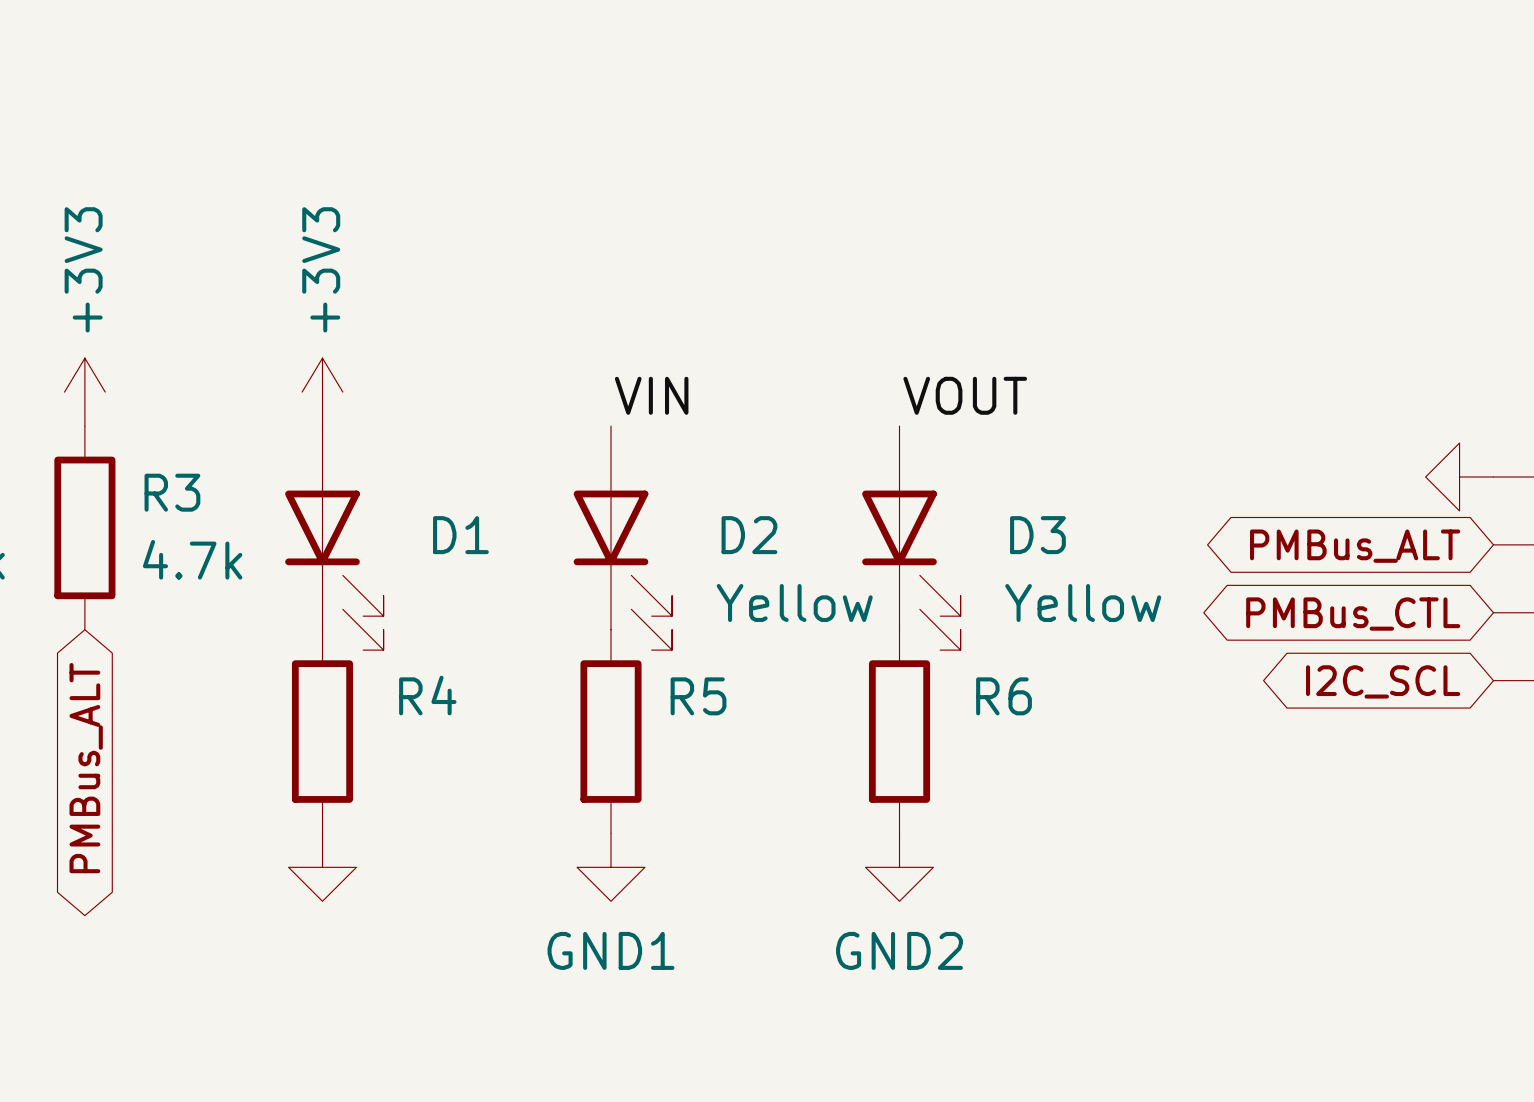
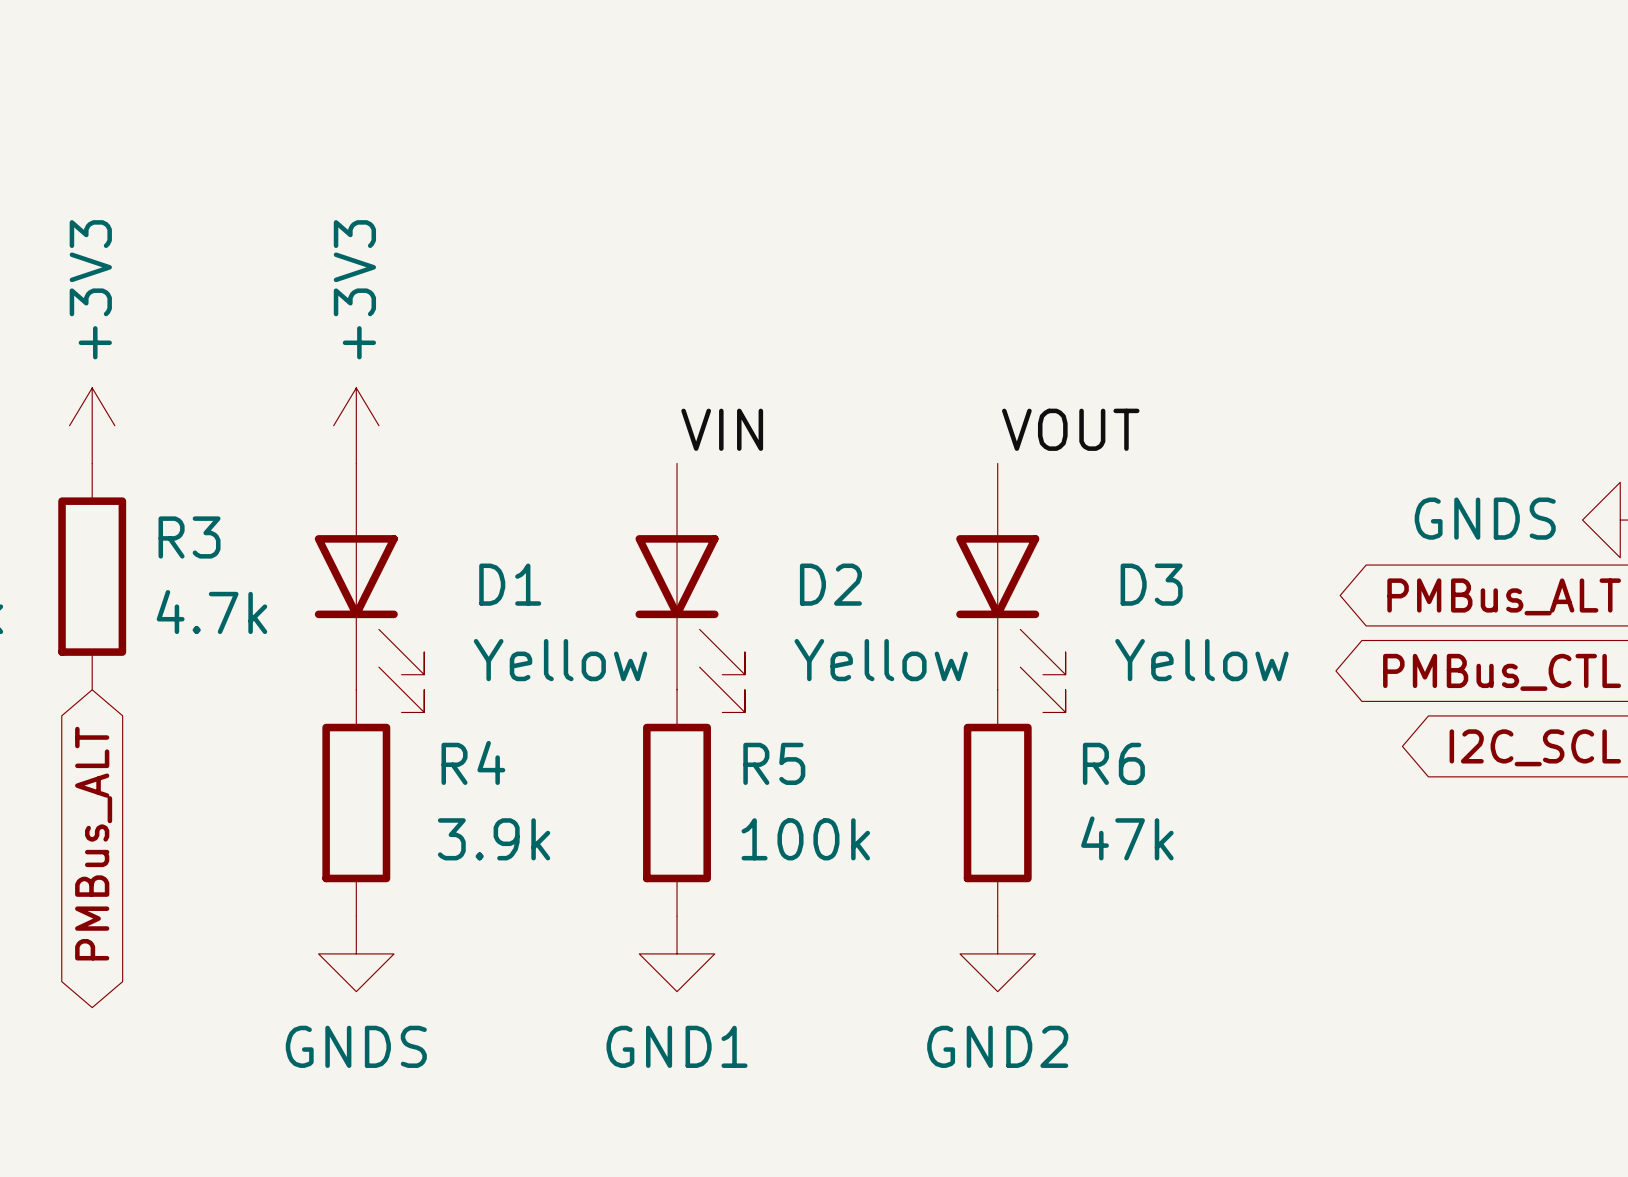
power symbol text: none -> GNDS (1485, 518)
D1 value: none -> Yellow (560, 660)
R6 value: none -> 47k (1127, 838)
R4 value: none -> 3.9k (494, 839)
R5 value: none -> 100k (805, 839)
power symbol text: none -> GNDS (356, 1046)

